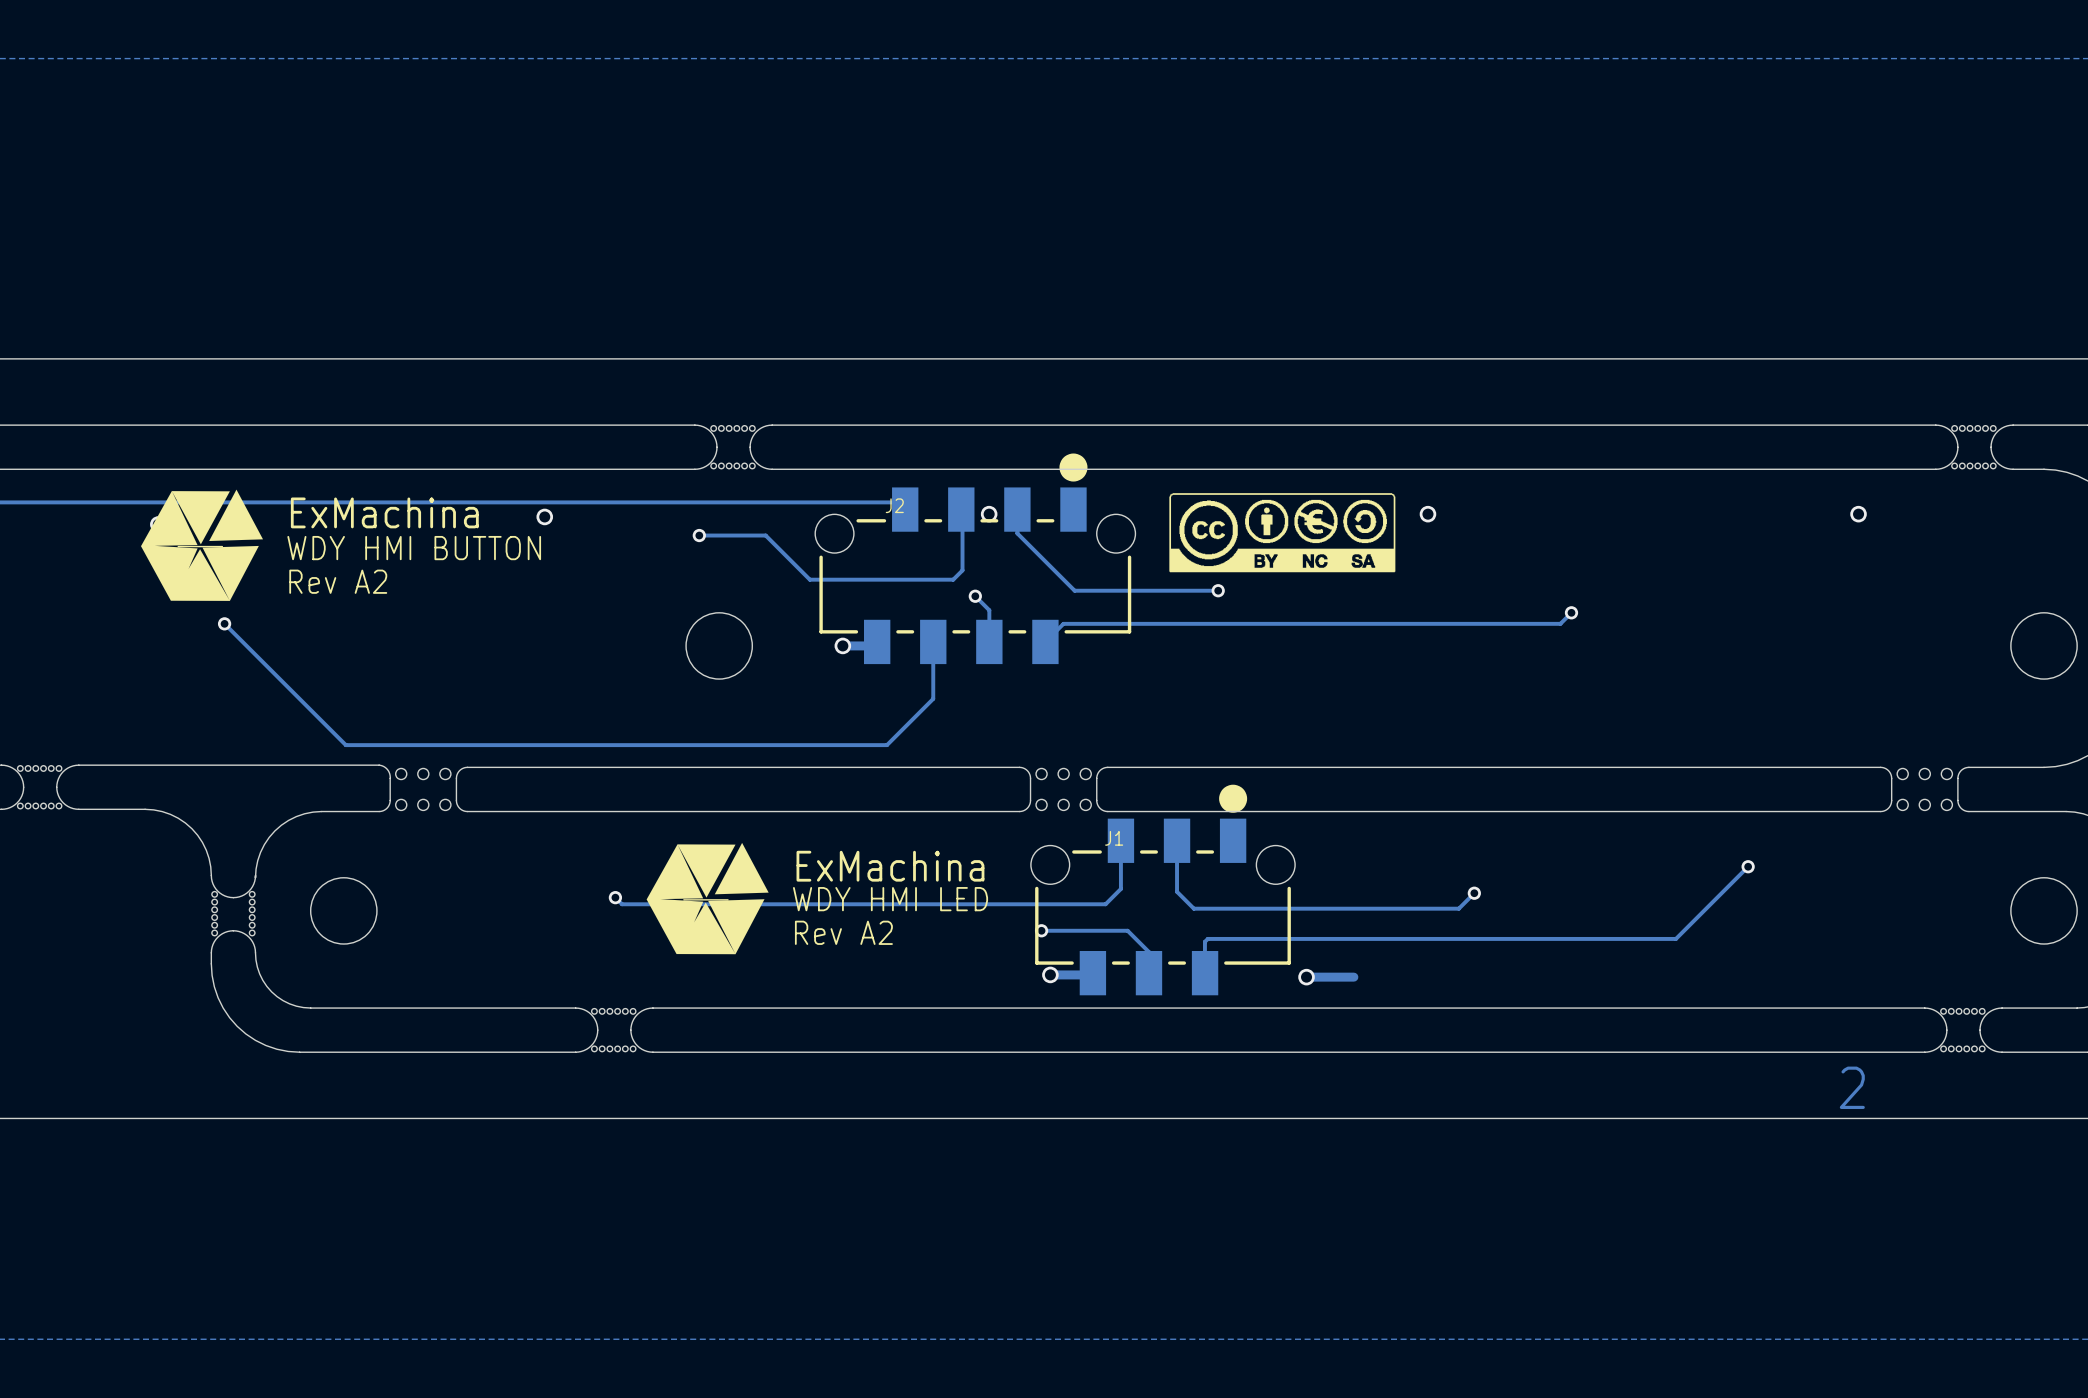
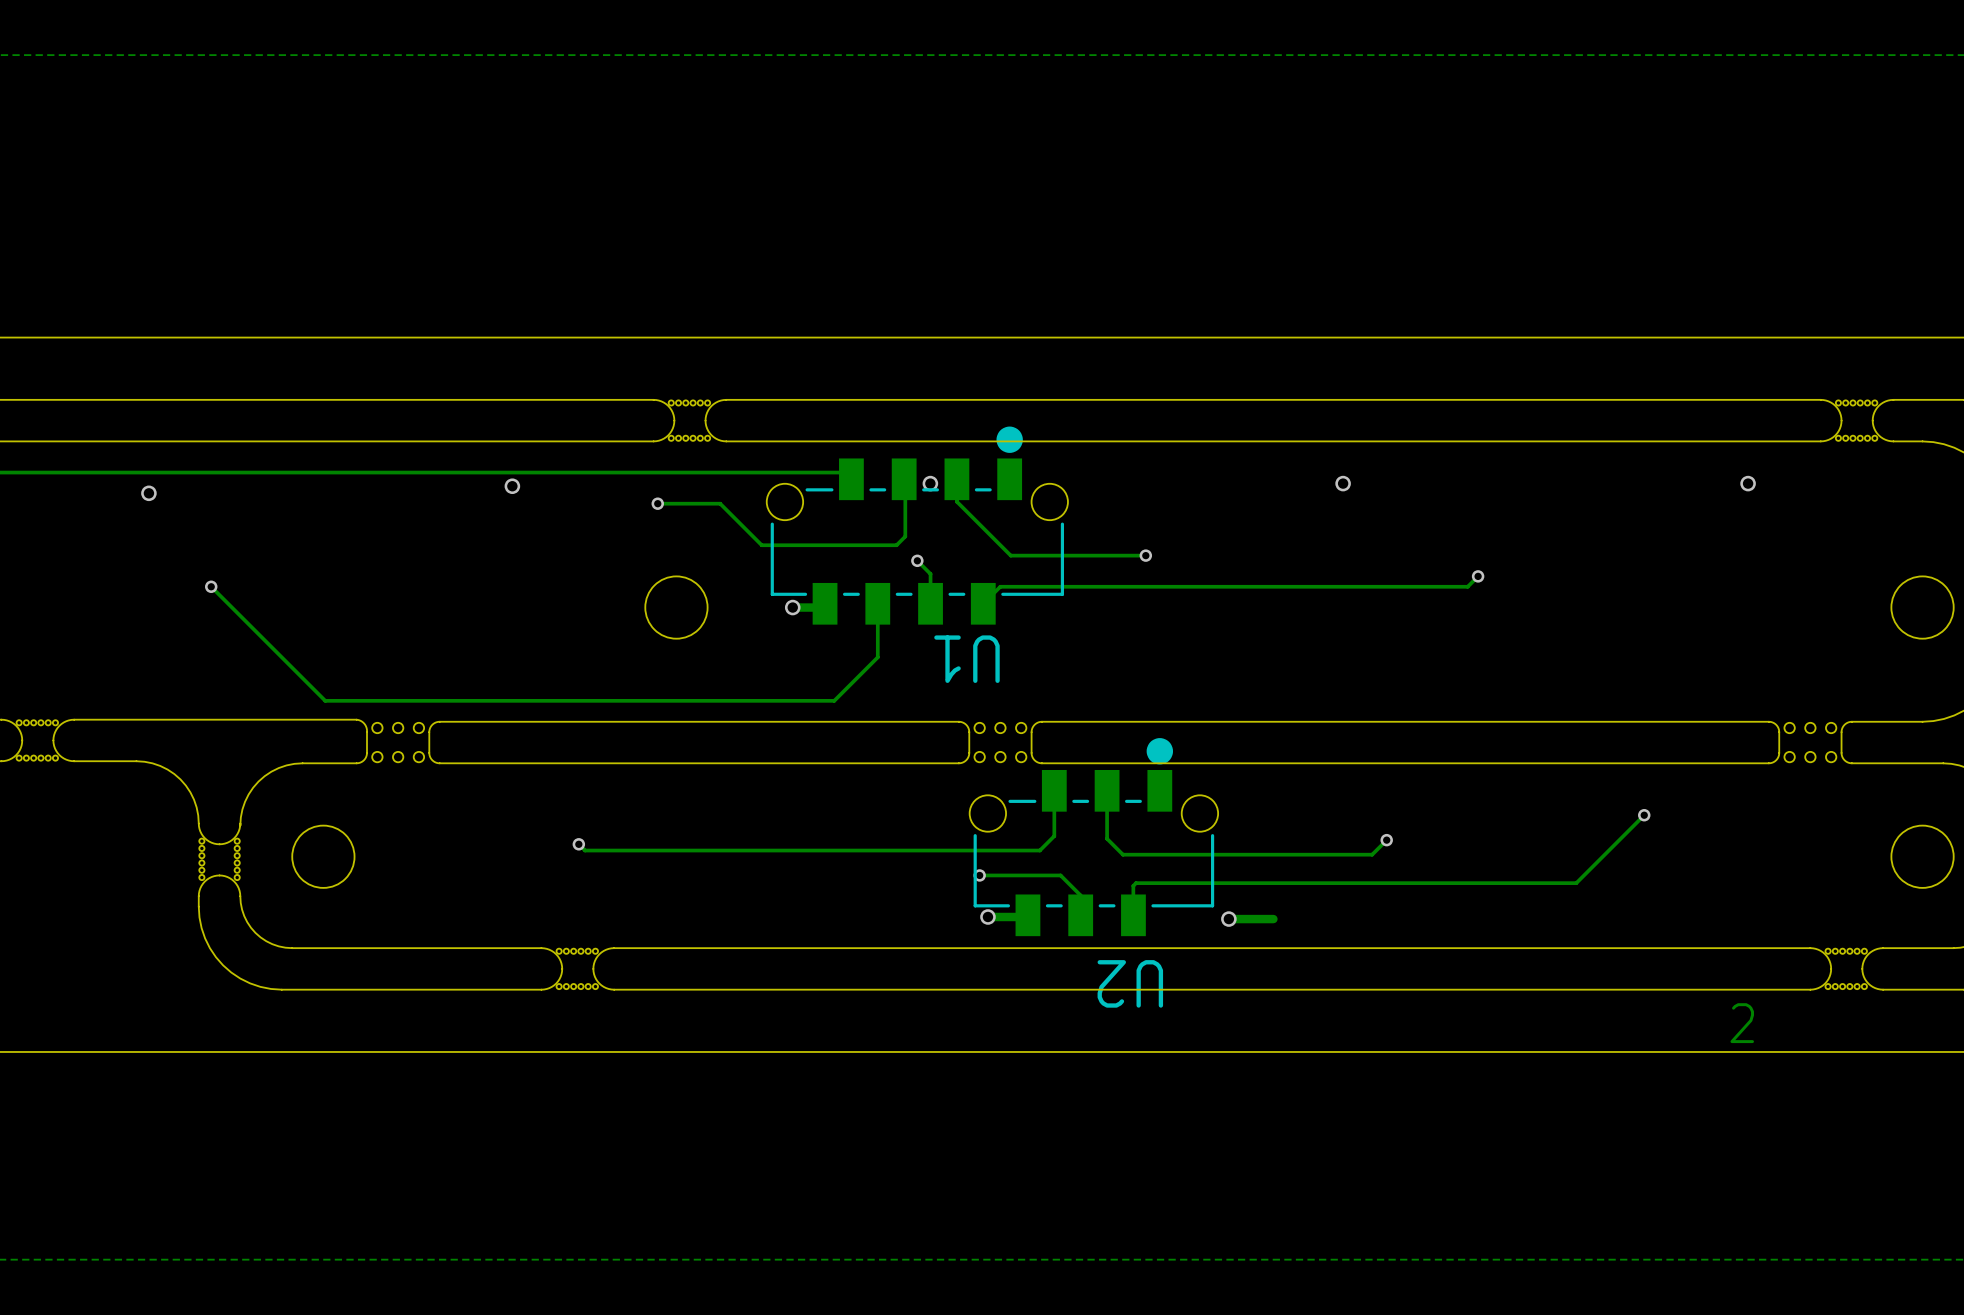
drawing: [141, 489, 264, 601] -> none
drawing: [1169, 493, 1396, 573] -> none
J2 name: J2 (894, 505) -> U1 (966, 659)
text: WDY HMI BUTTON (414, 548) -> none
text: Rev A2 (338, 581) -> none
J1 name: J1 (1114, 838) -> U2 (1130, 983)
drawing: [646, 842, 769, 955] -> none
text: WDY HMI LED (890, 899) -> none
text: Rev A2 (843, 932) -> none

